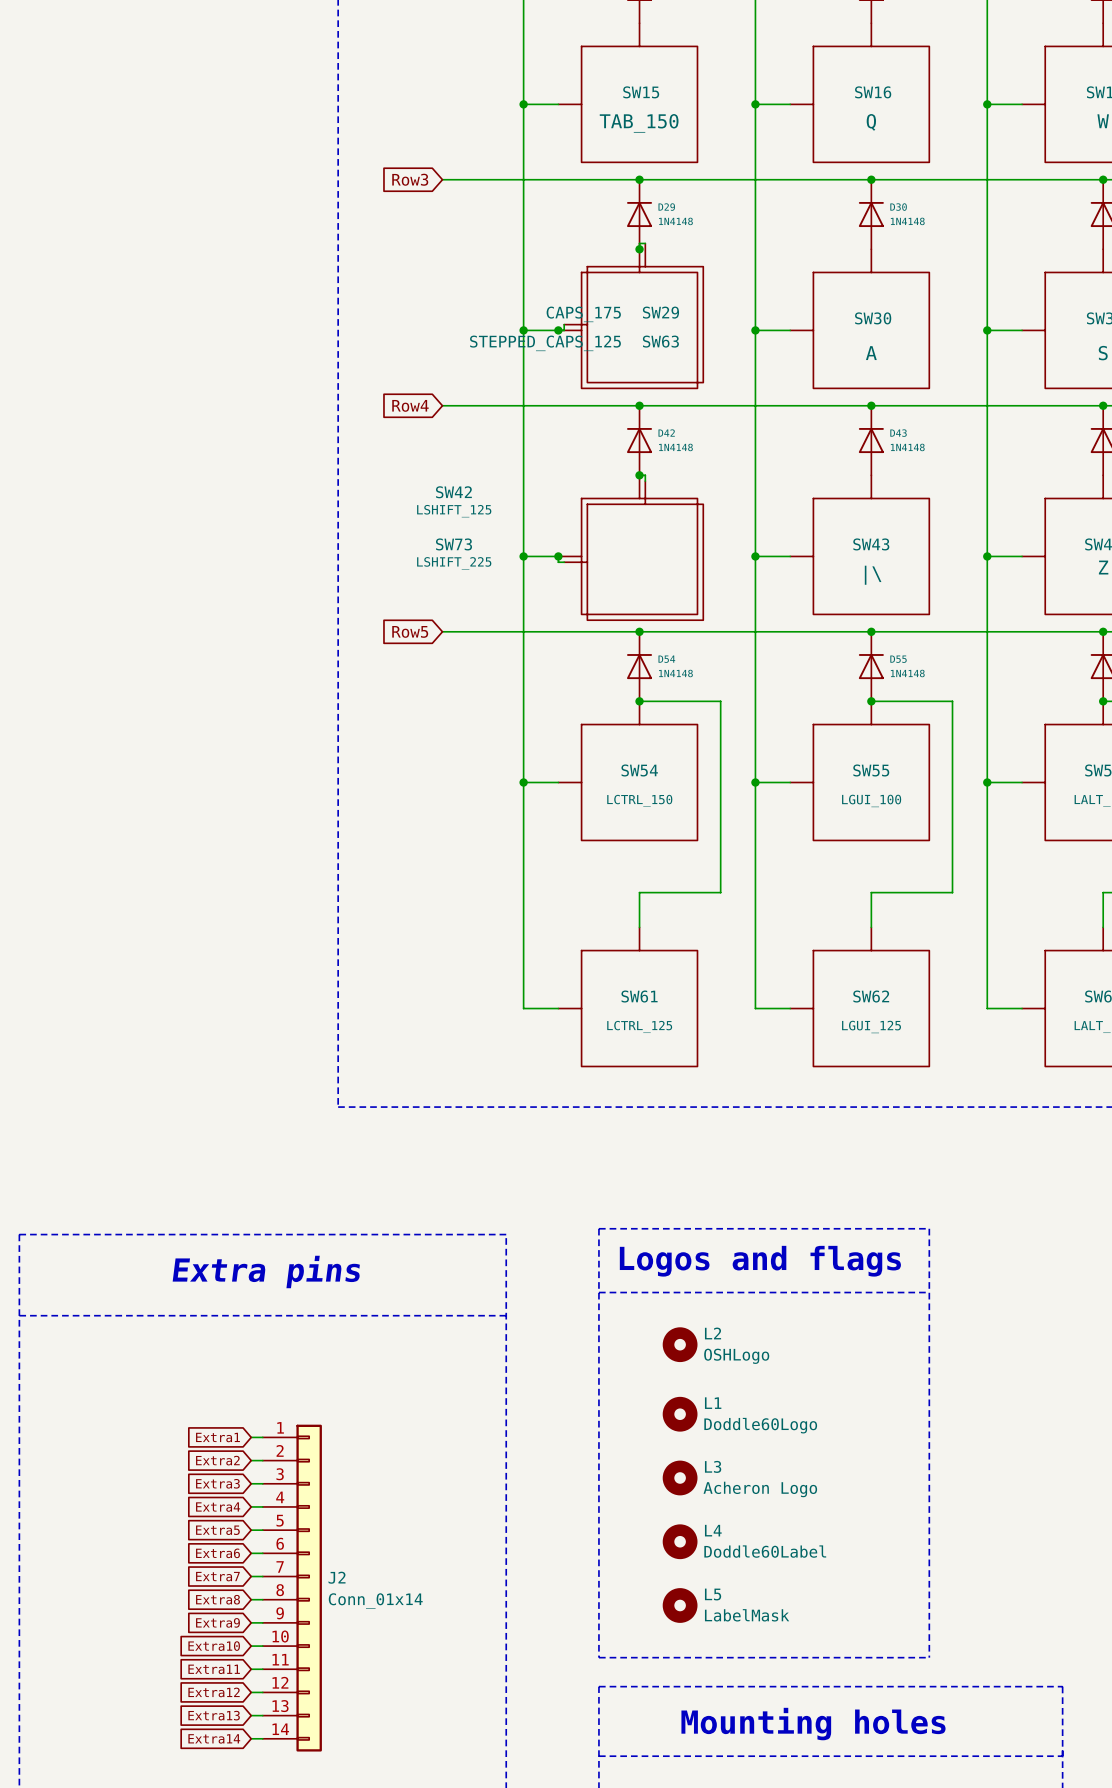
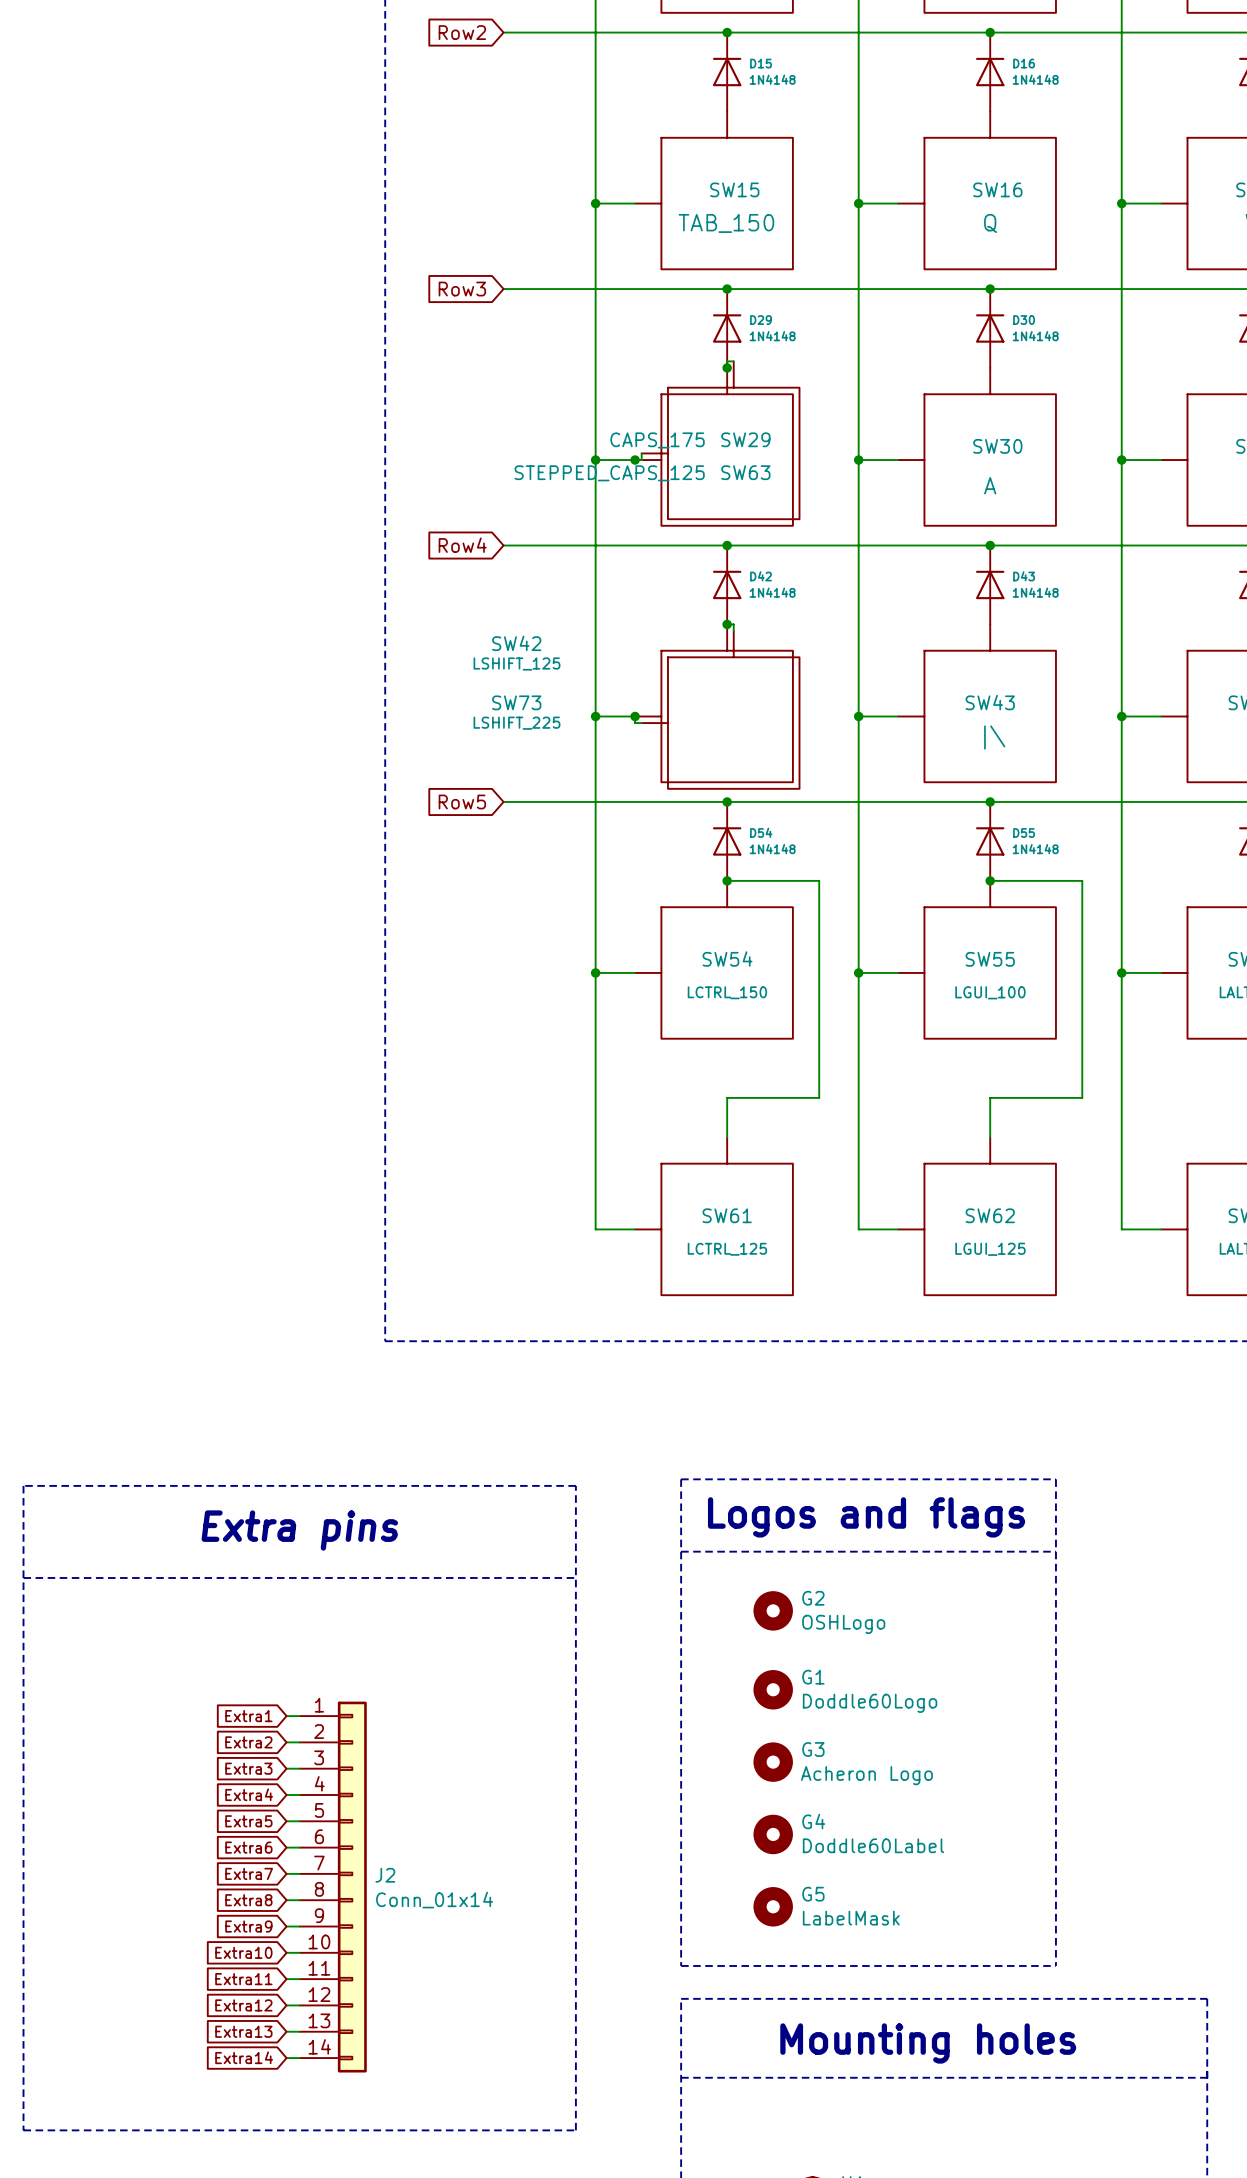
L2 name: L2 (713, 1333) -> G2 (813, 1598)
L1 name: L1 (713, 1403) -> G1 (813, 1677)
L3 name: L3 (713, 1466) -> G3 (813, 1749)
L4 name: L4 (713, 1530) -> G4 (813, 1821)
L5 name: L5 (713, 1594) -> G5 (813, 1894)

